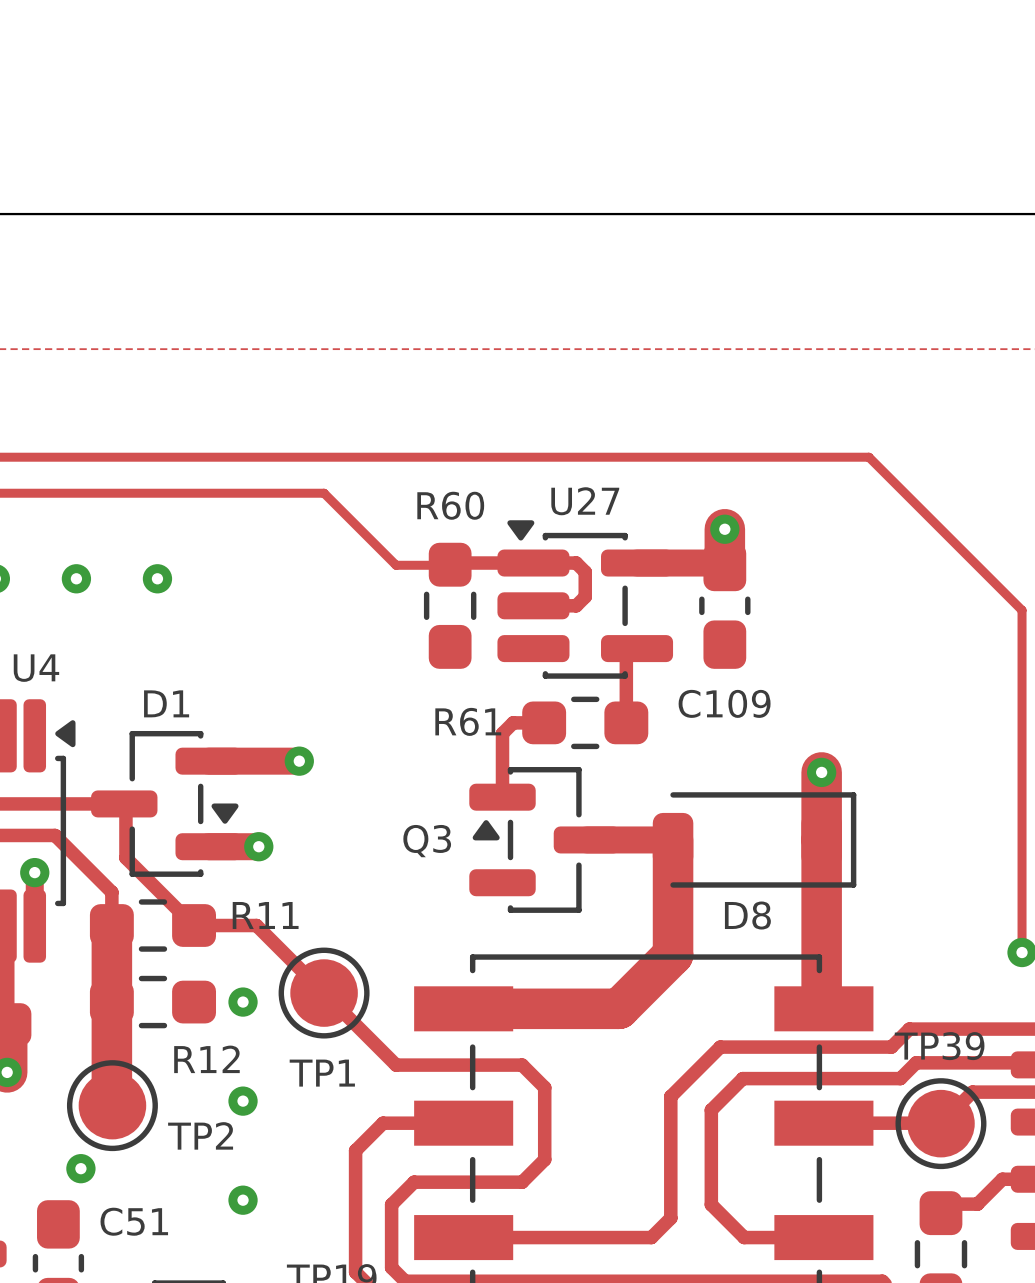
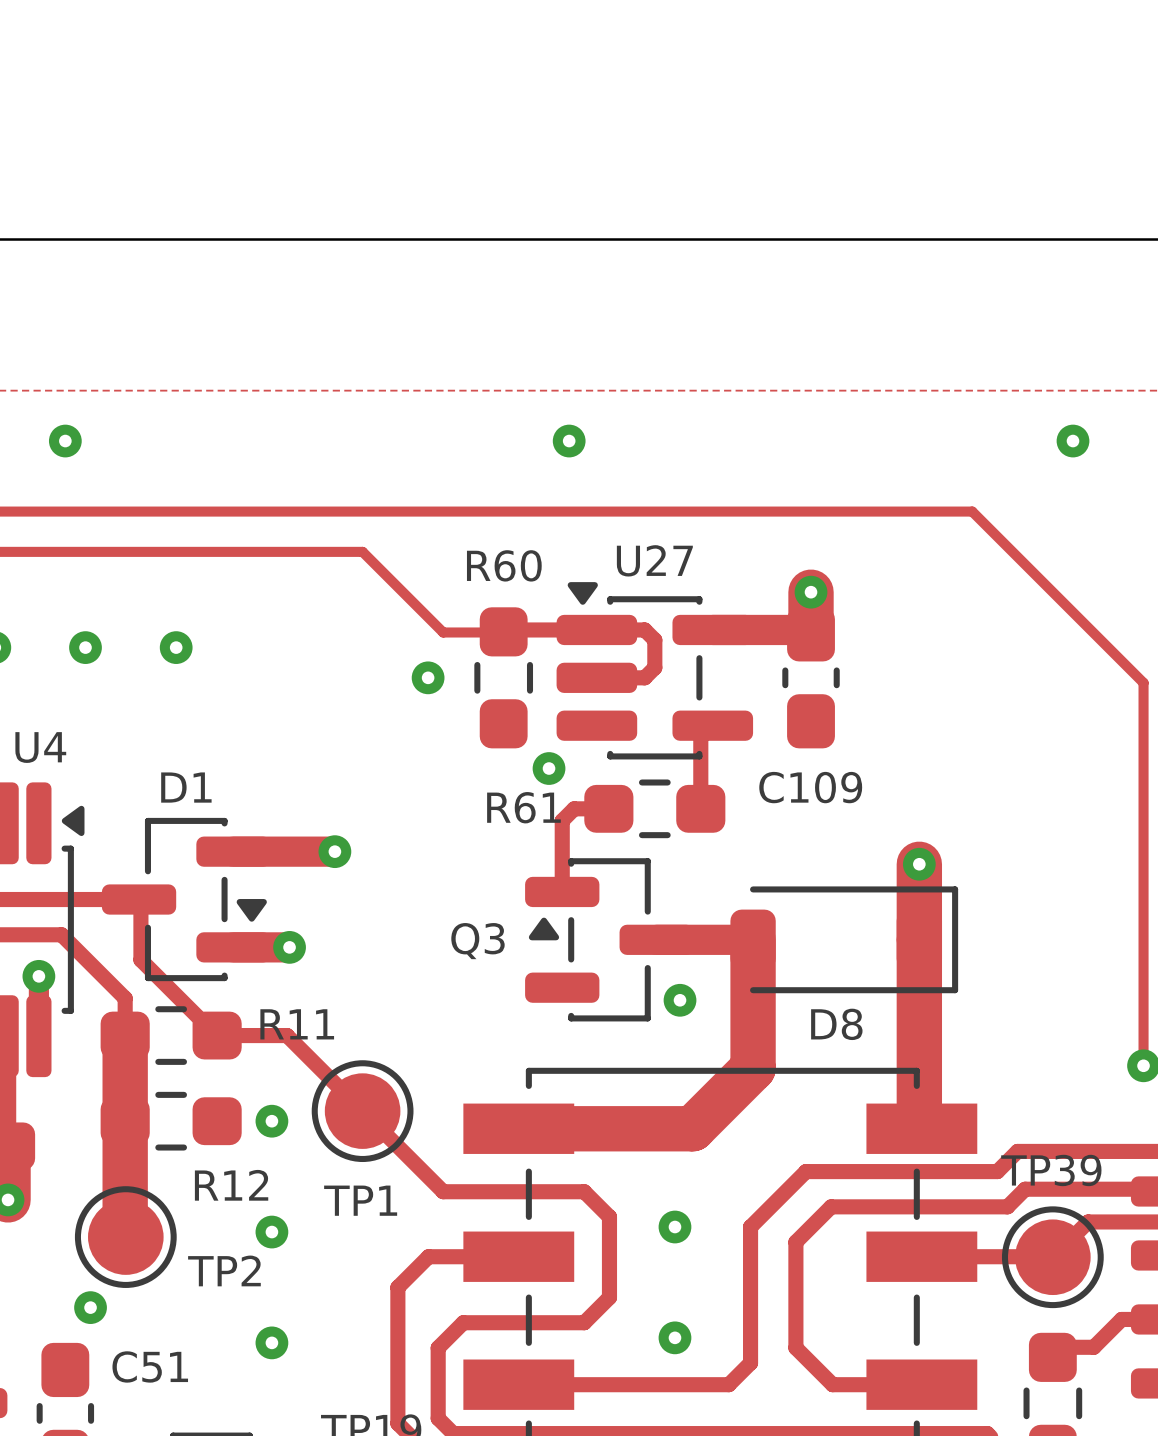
via: none -> (65, 441)
via: none -> (569, 441)
via: none -> (1073, 441)
via: none -> (428, 677)
via: none -> (549, 768)
via: none -> (680, 1000)
via: none -> (674, 1227)
via: none -> (674, 1337)

